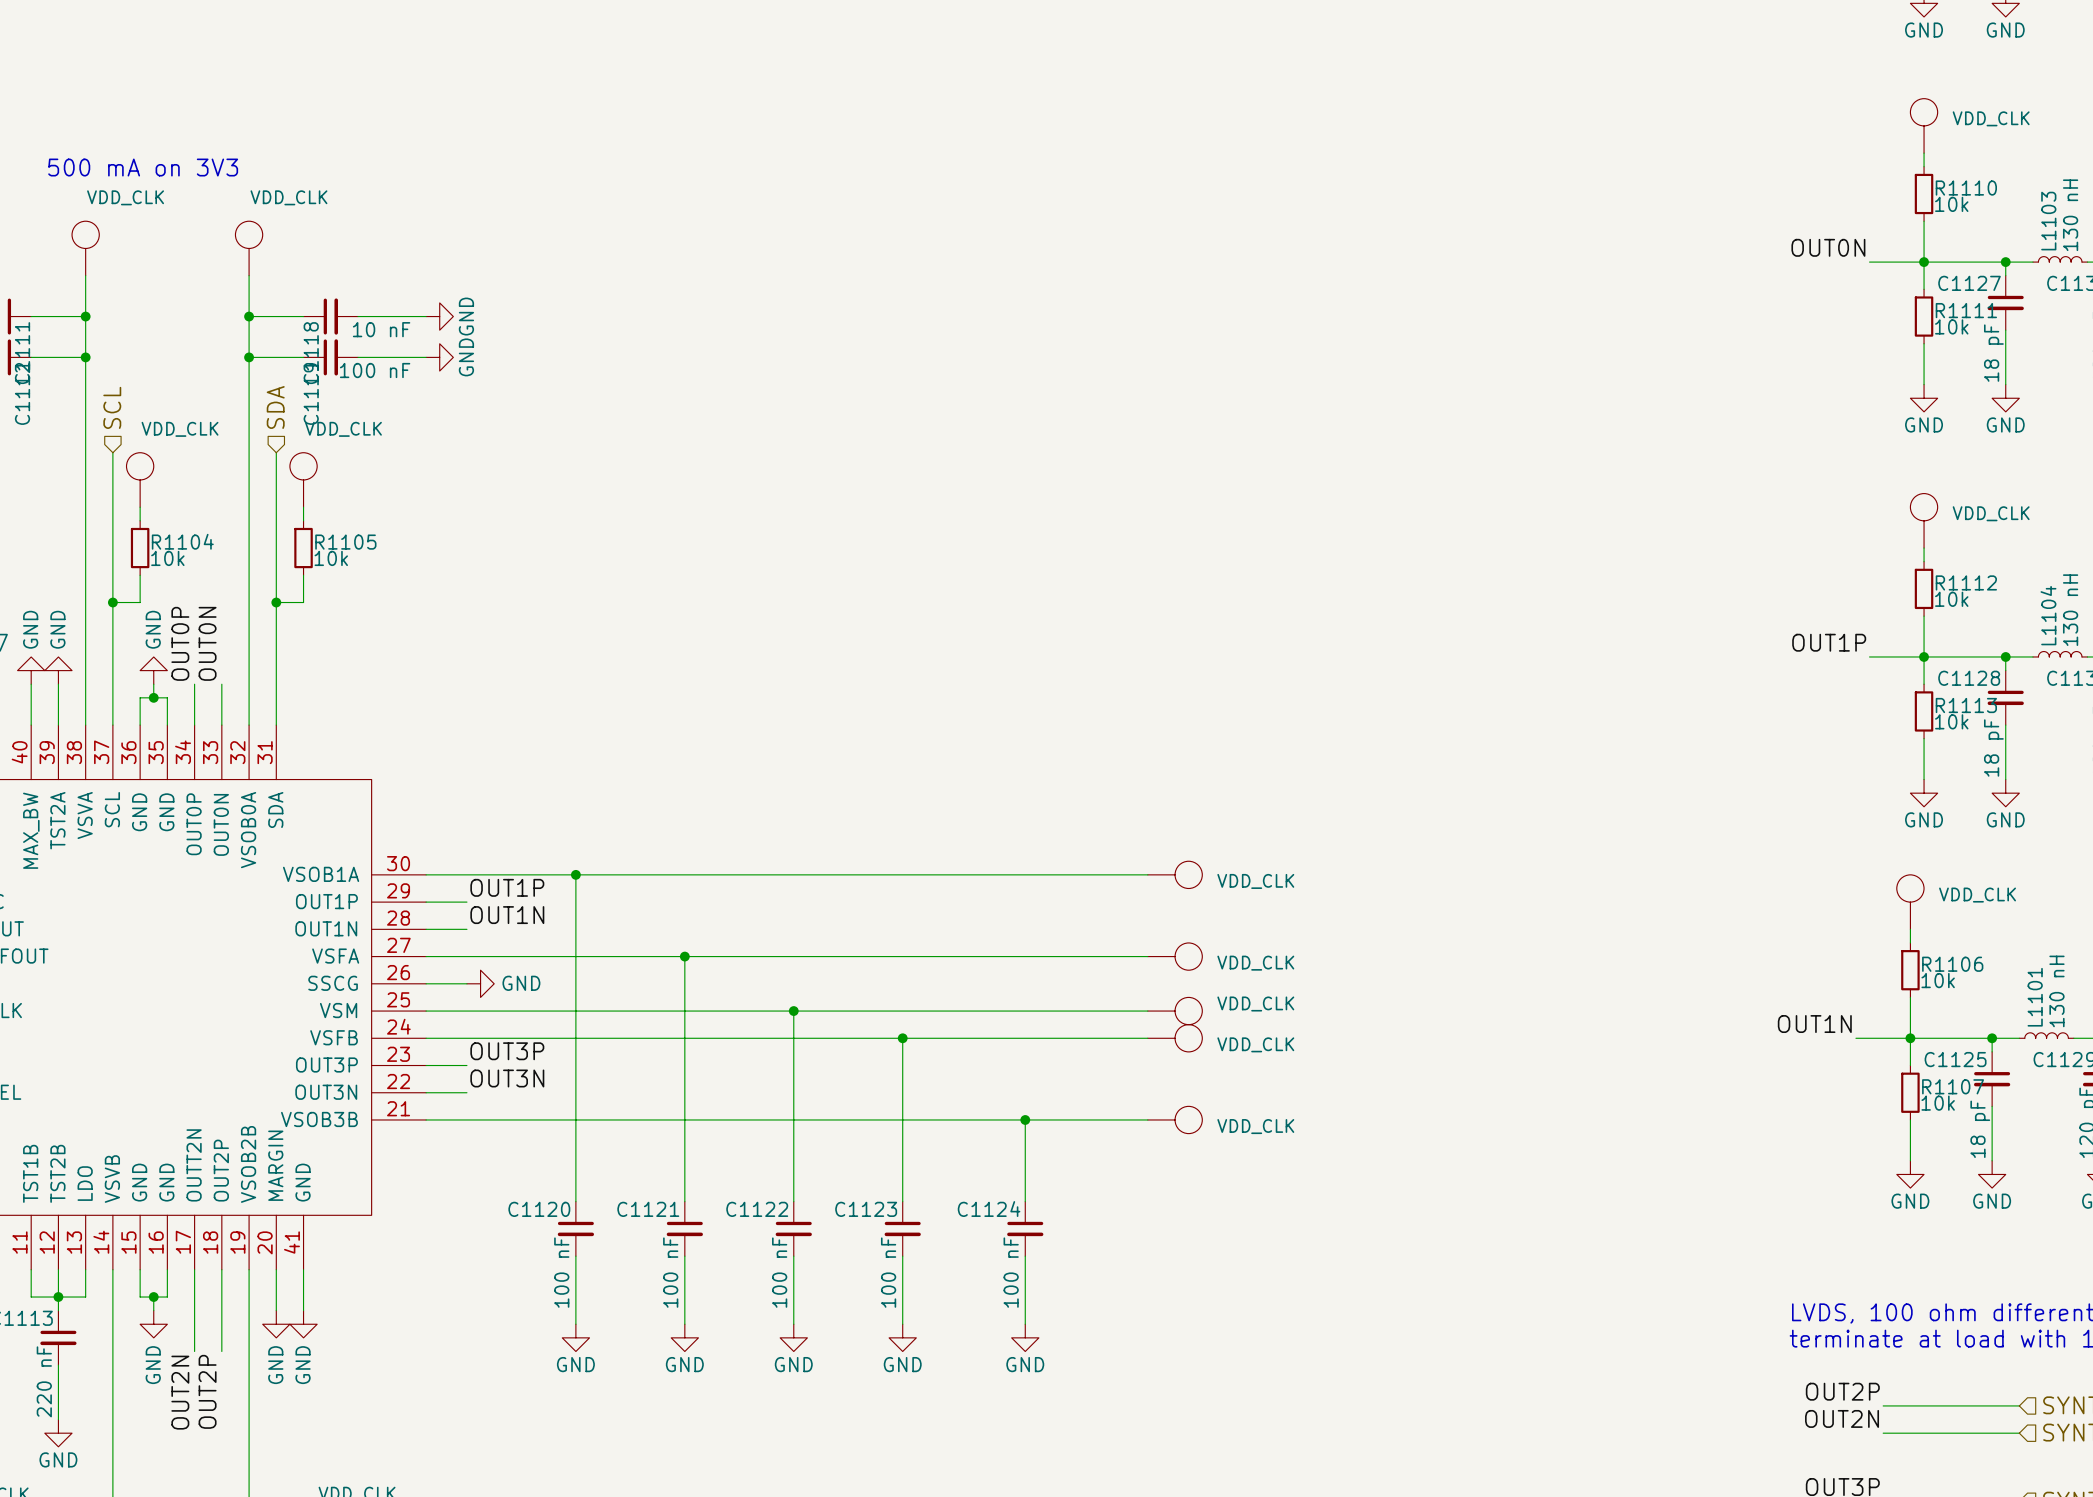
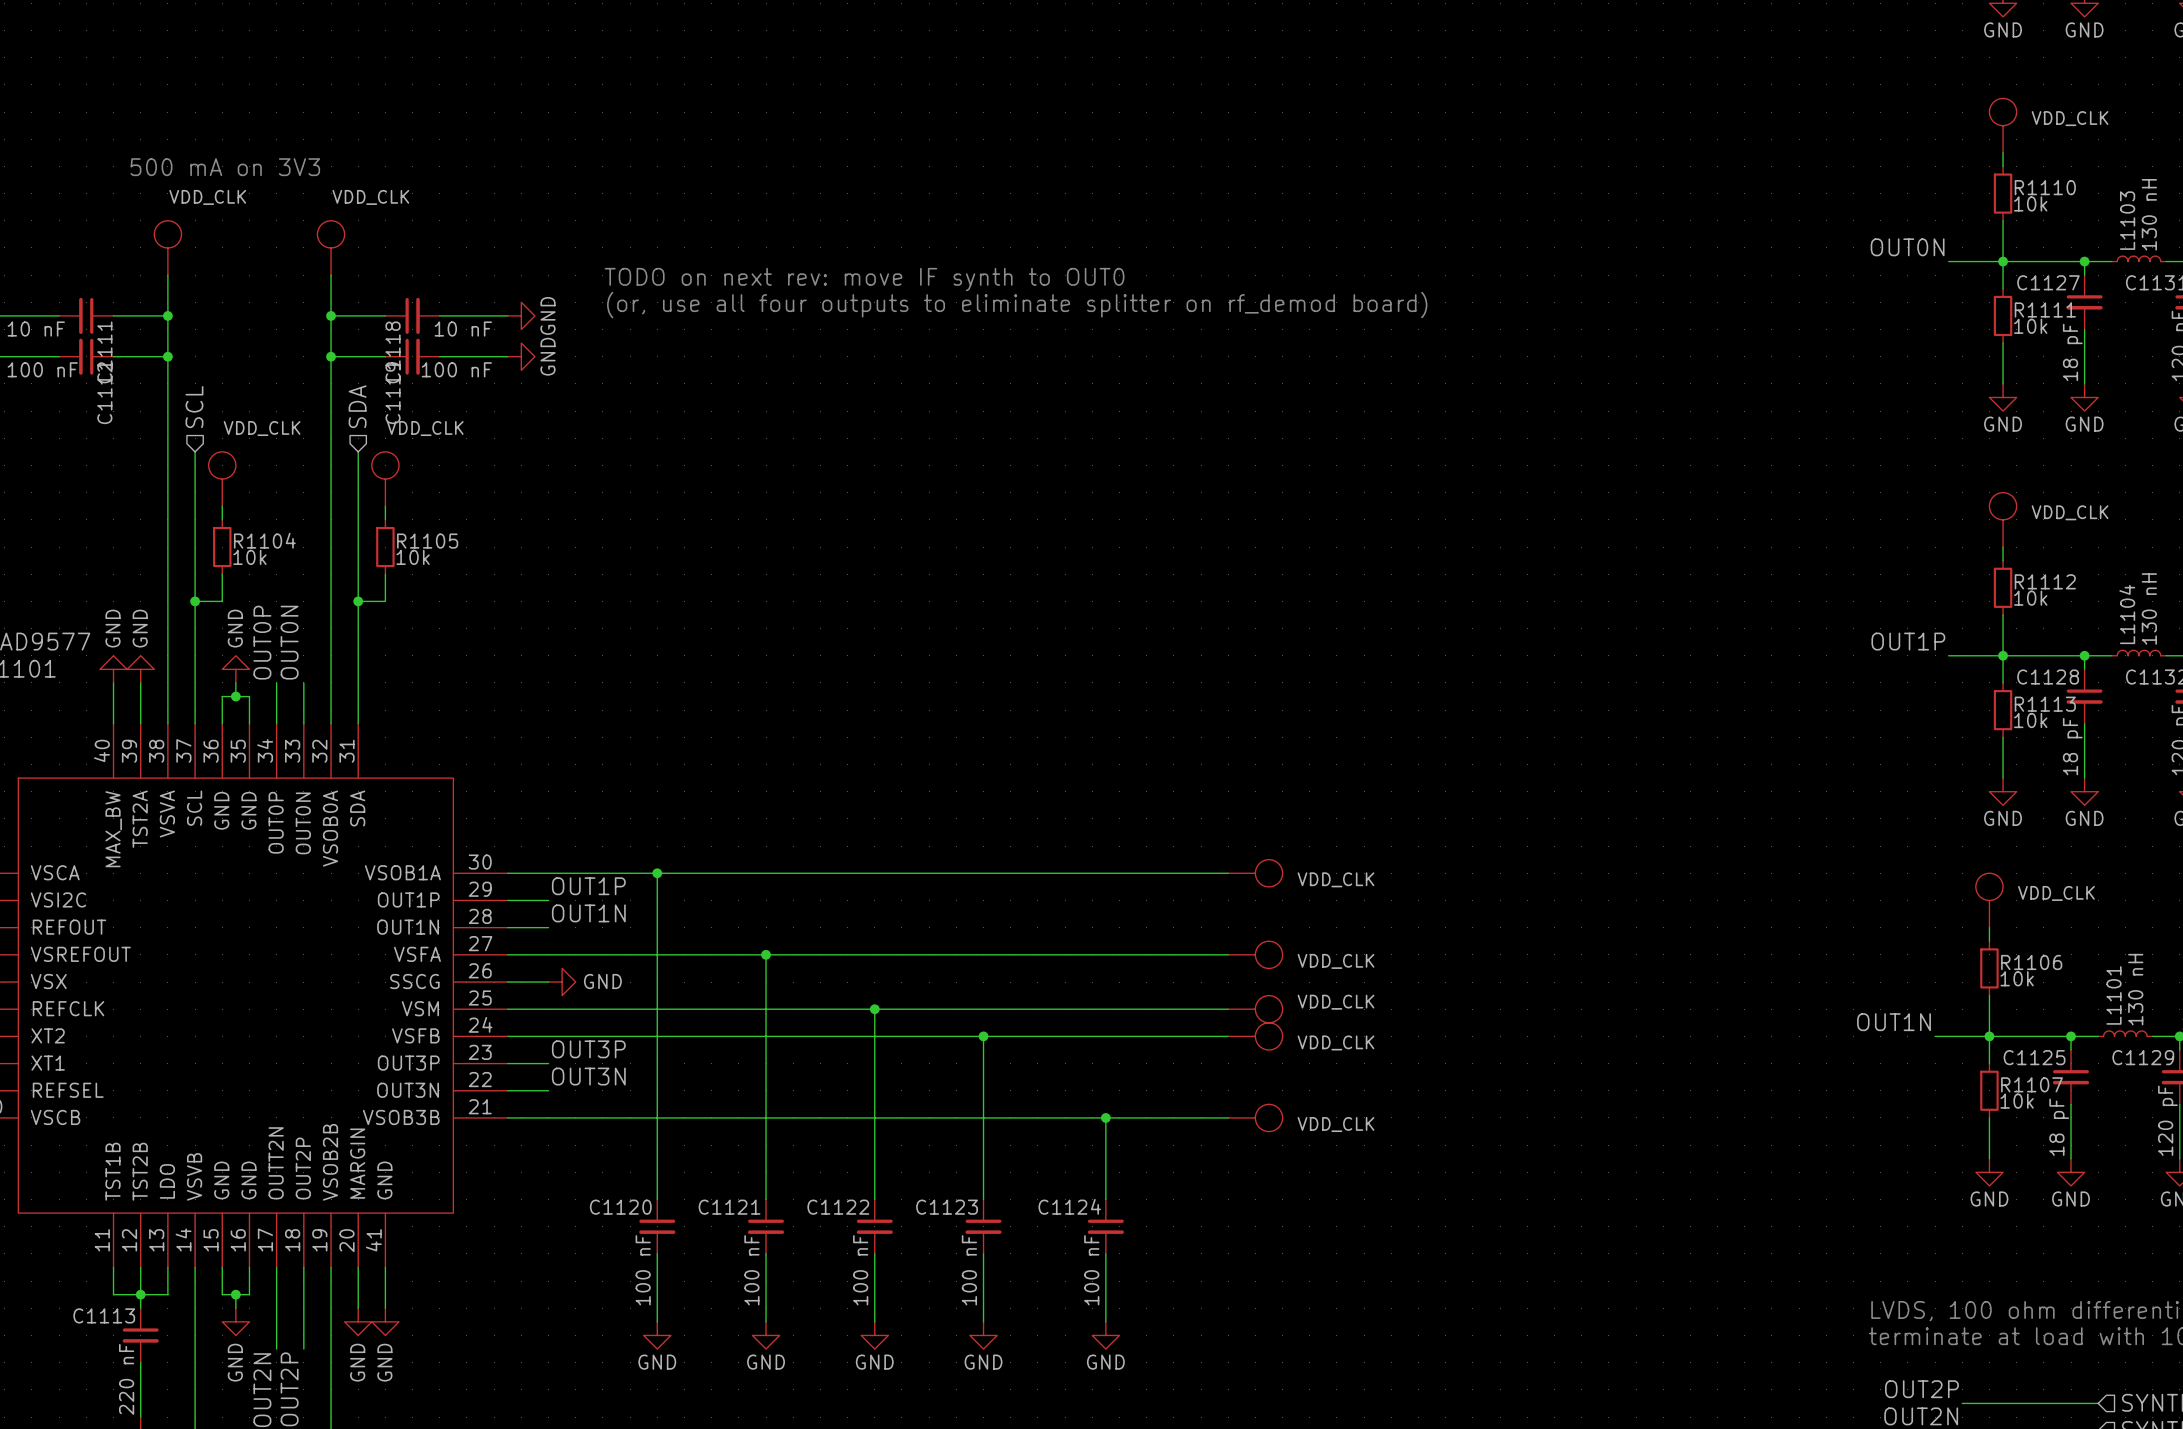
text: none -> TODO on next rev: move IF synth to OUT0 (864, 279)
text: none -> (or, use all four outputs to eliminate splitter on rf_demod board) (1017, 305)

